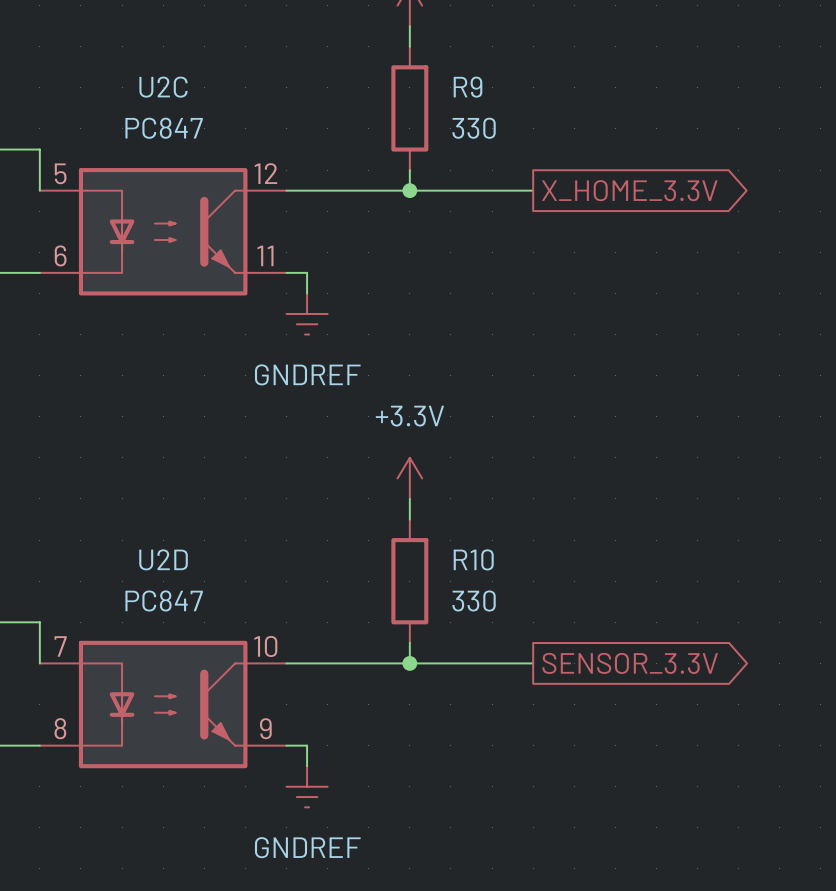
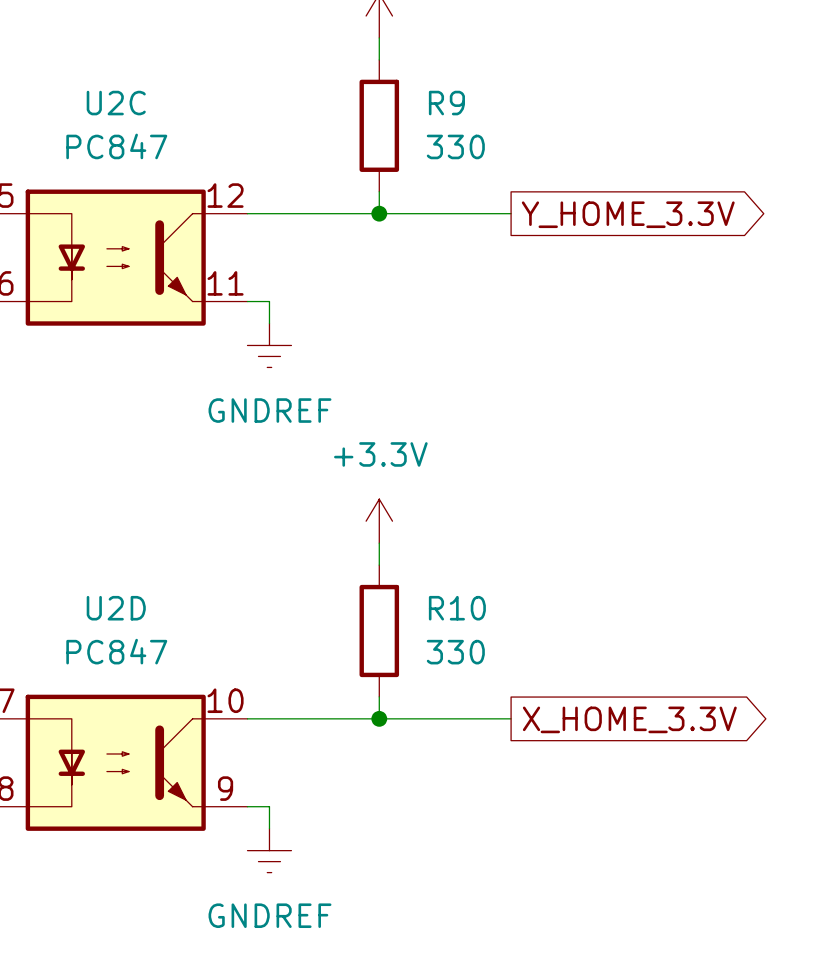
global label: X_HOME_3.3V (629, 190) -> Y_HOME_3.3V (628, 214)
global label: SENSOR_3.3V (630, 663) -> X_HOME_3.3V (629, 719)

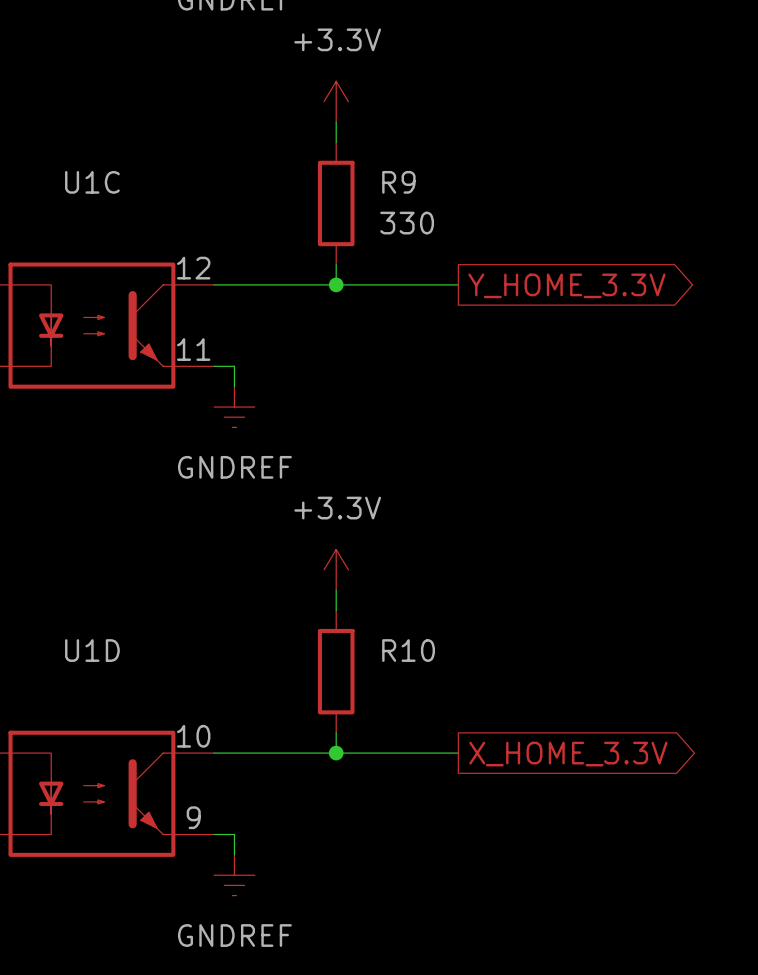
U2C name: U2C (116, 103) -> U1C (92, 182)
U2C value: PC847 (116, 146) -> none
U2D name: U2D (116, 608) -> U1D (92, 650)
U2D value: PC847 (116, 651) -> none
R10 value: 330 (455, 652) -> none

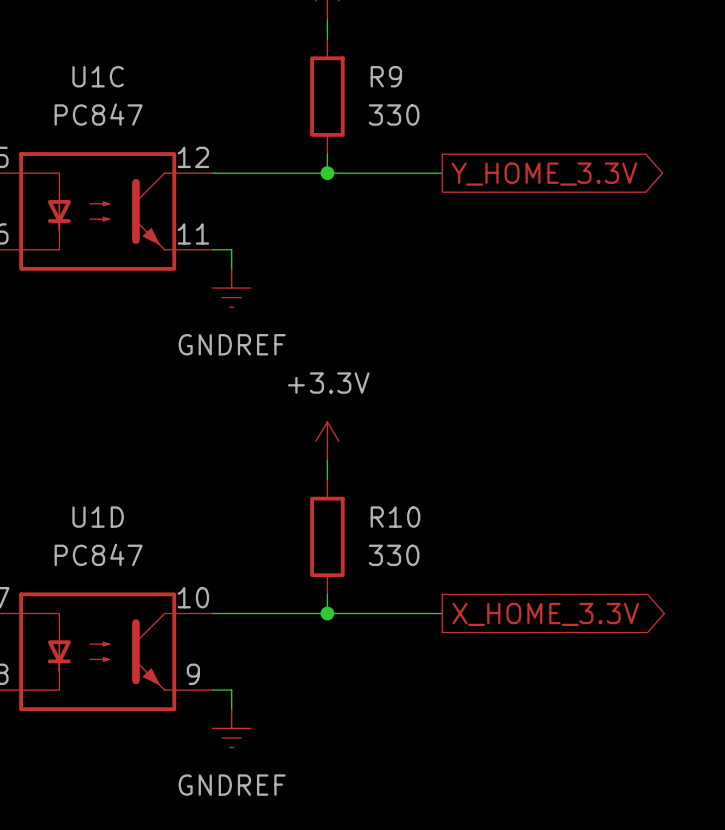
U1C value: none -> PC847 (98, 114)
U1D value: none -> PC847 (98, 554)
R10 value: none -> 330 (394, 555)

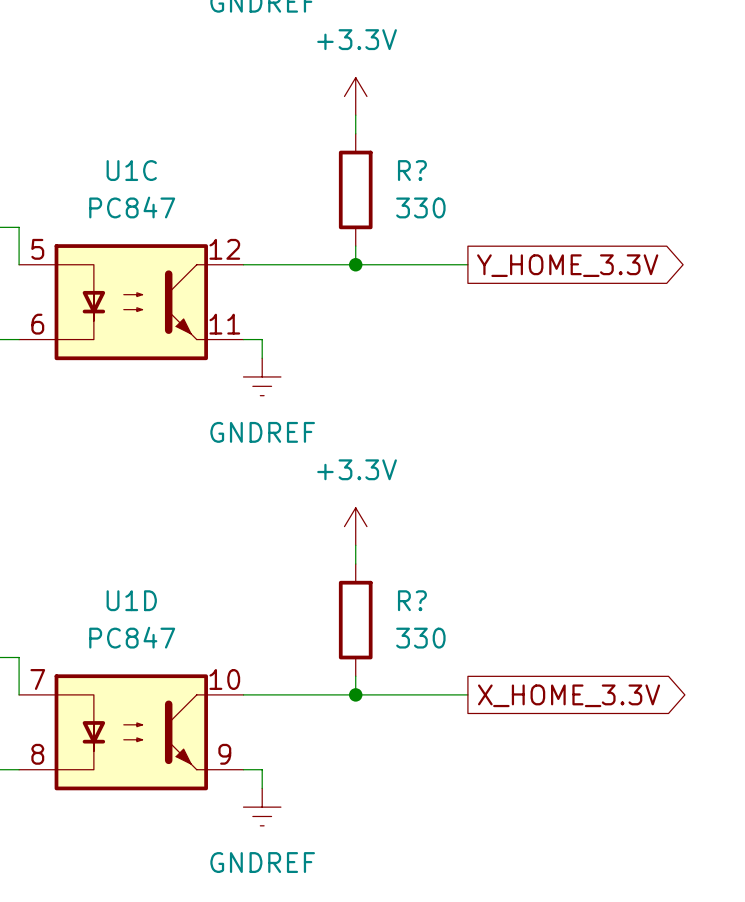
R9 name: R9 (386, 76) -> R? (412, 170)
R10 name: R10 (395, 517) -> R? (412, 600)

